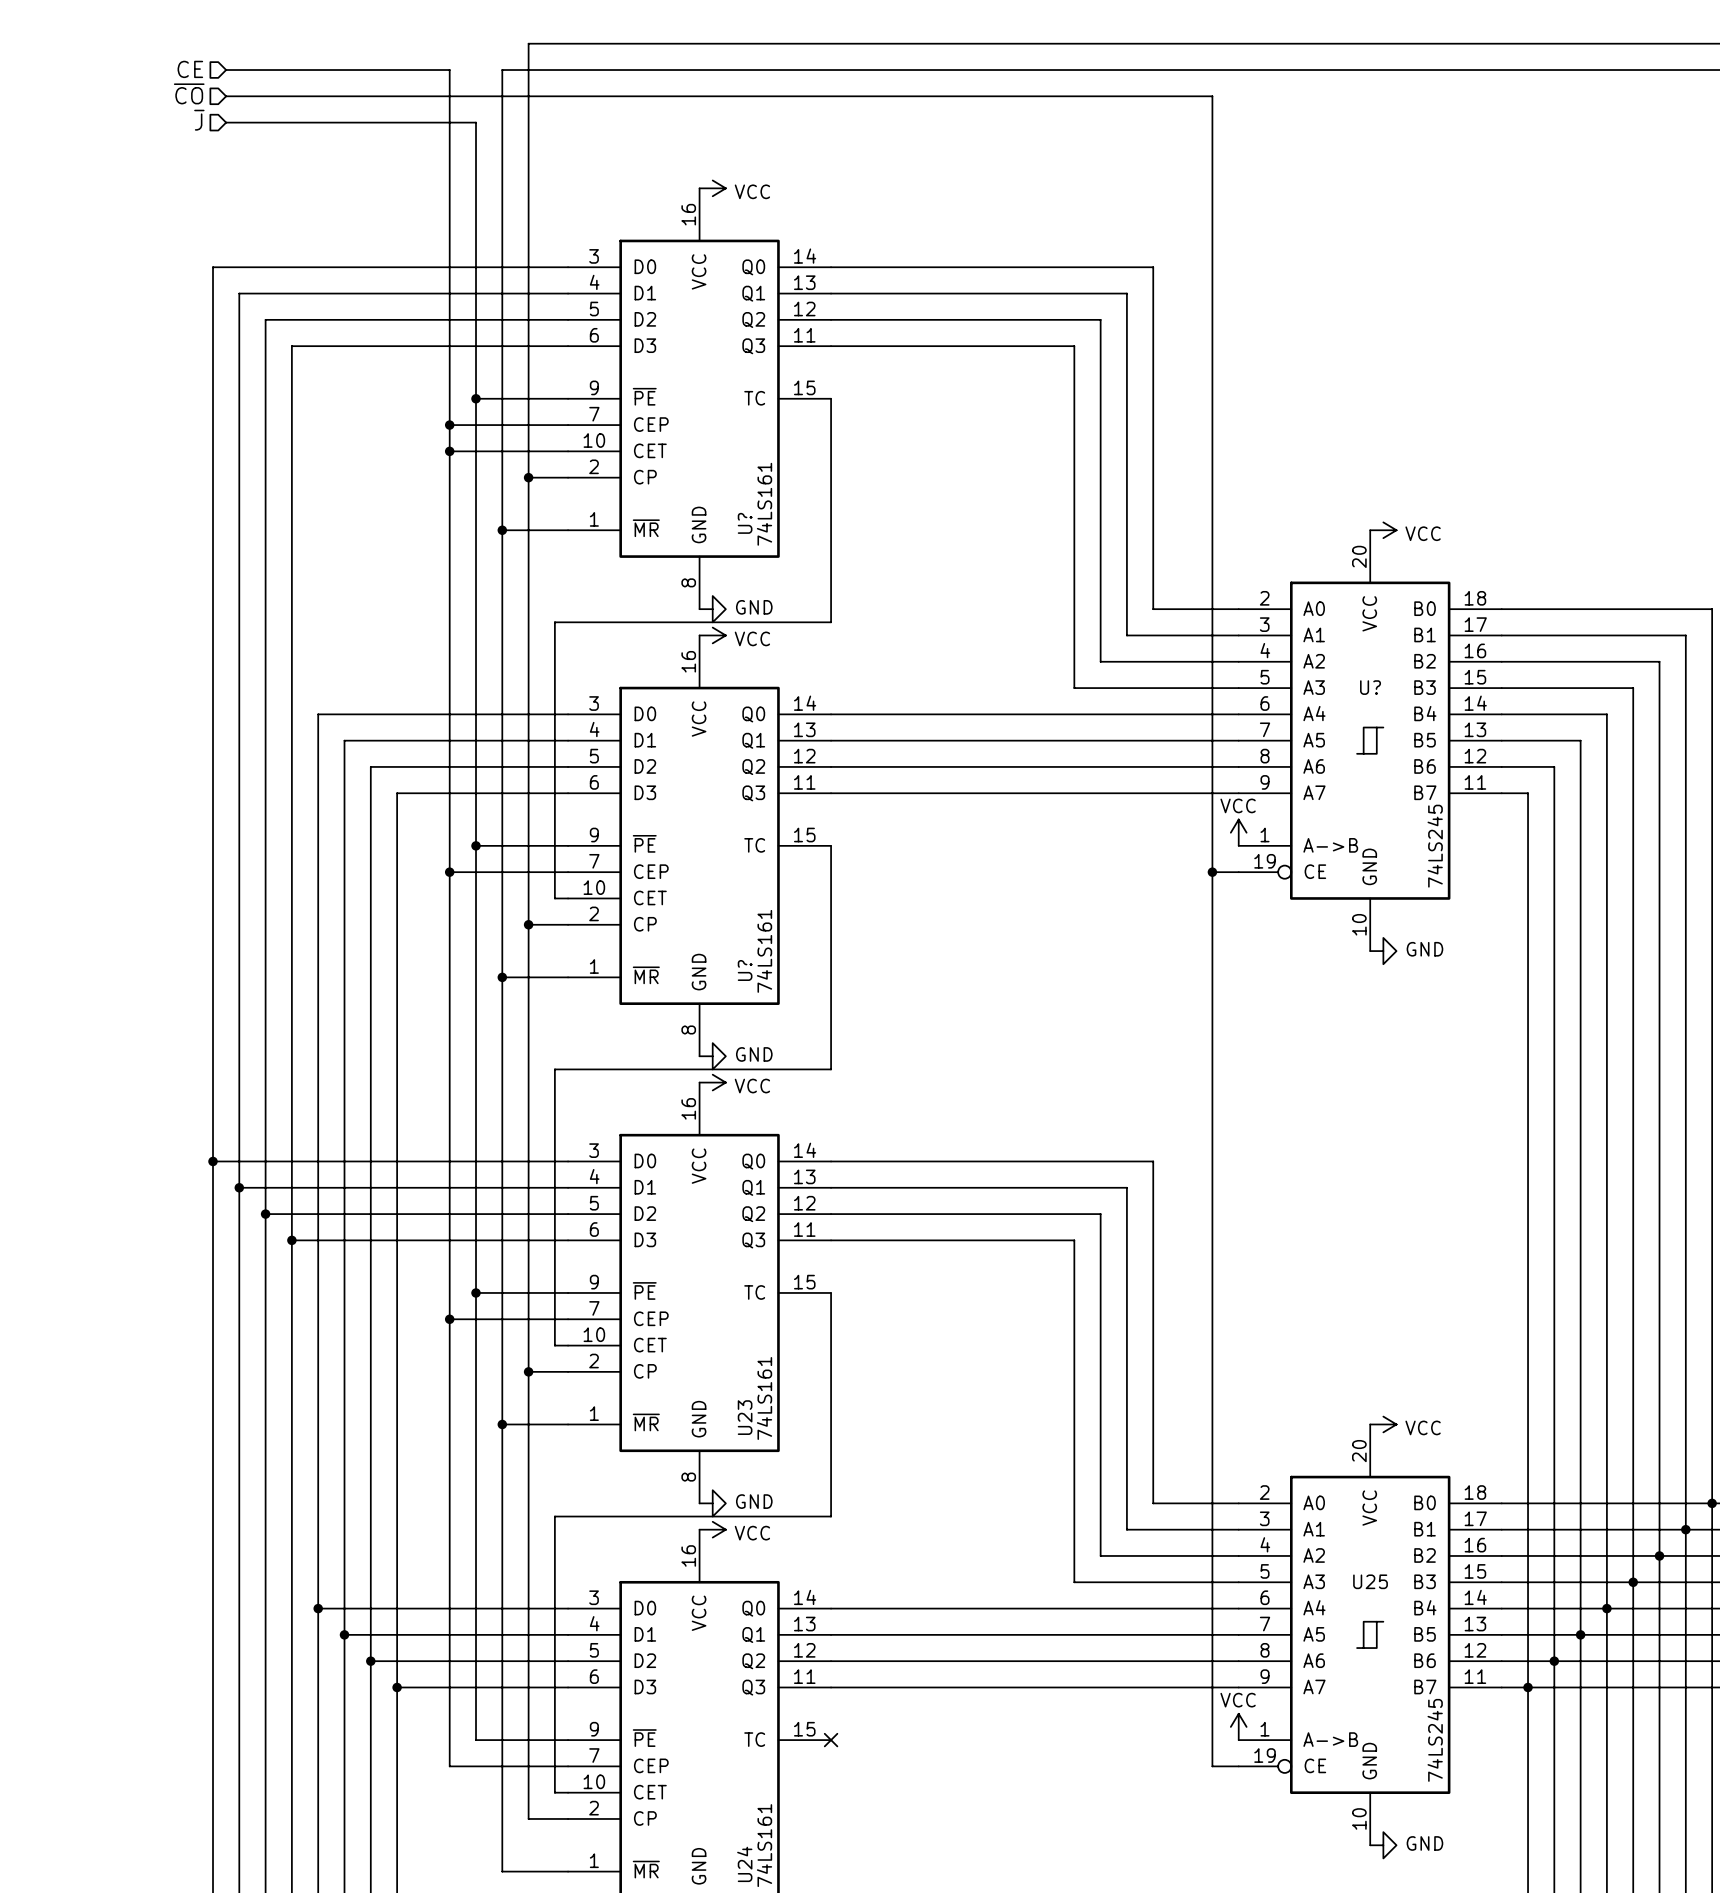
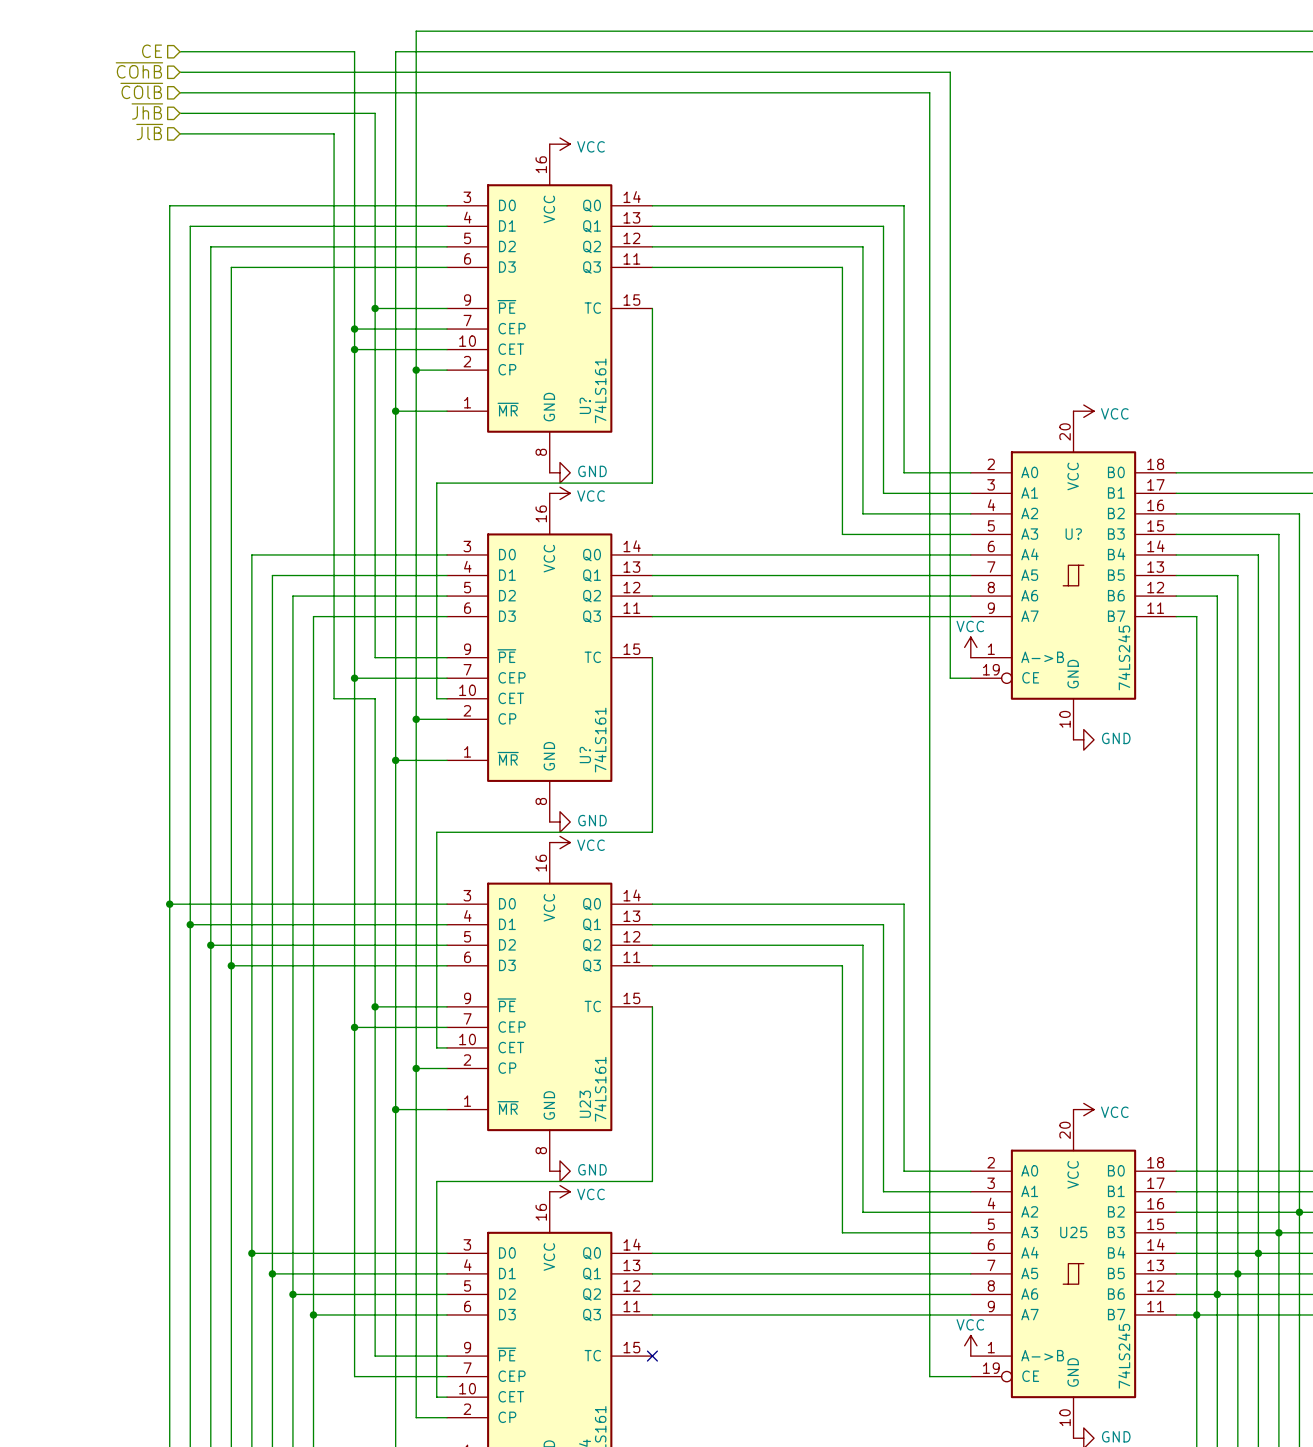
hierarchical label: ~{CO} (189, 93) -> ~{COhB} (139, 70)
hierarchical label: ~{J} (199, 120) -> ~{COlB} (141, 90)
wire: (476, 122) (476, 148) -> (179, 113) (375, 113)
hierarchical label: none -> ~{JhB} (147, 111)
hierarchical label: none -> ~{JlB} (149, 132)
wire: (476, 845) (476, 898) -> (179, 133) (334, 133) (334, 698) (375, 698)
junction: (476, 845) -> none
wire: (1212, 872) (1212, 1766) -> (375, 92) (929, 92) (929, 1376) (950, 1376)
junction: (1212, 872) -> none

